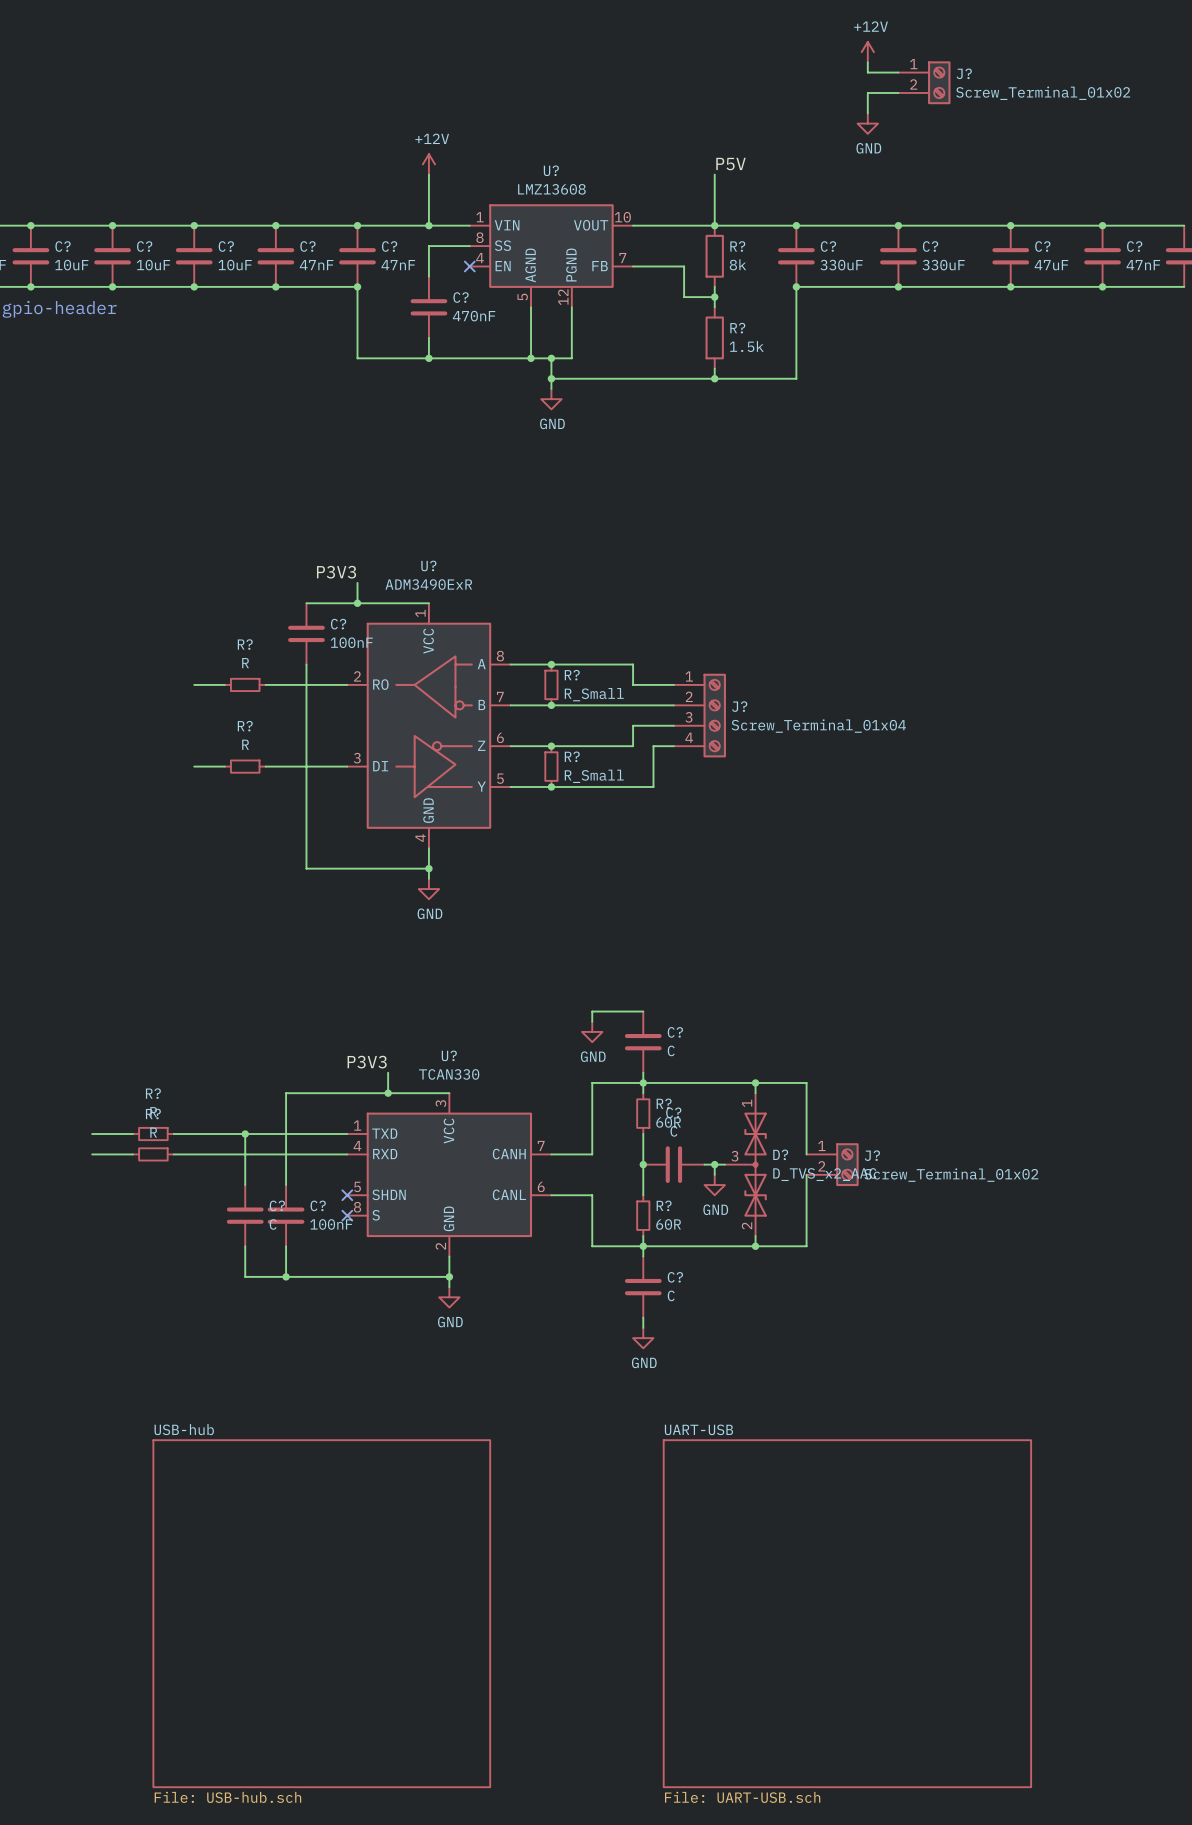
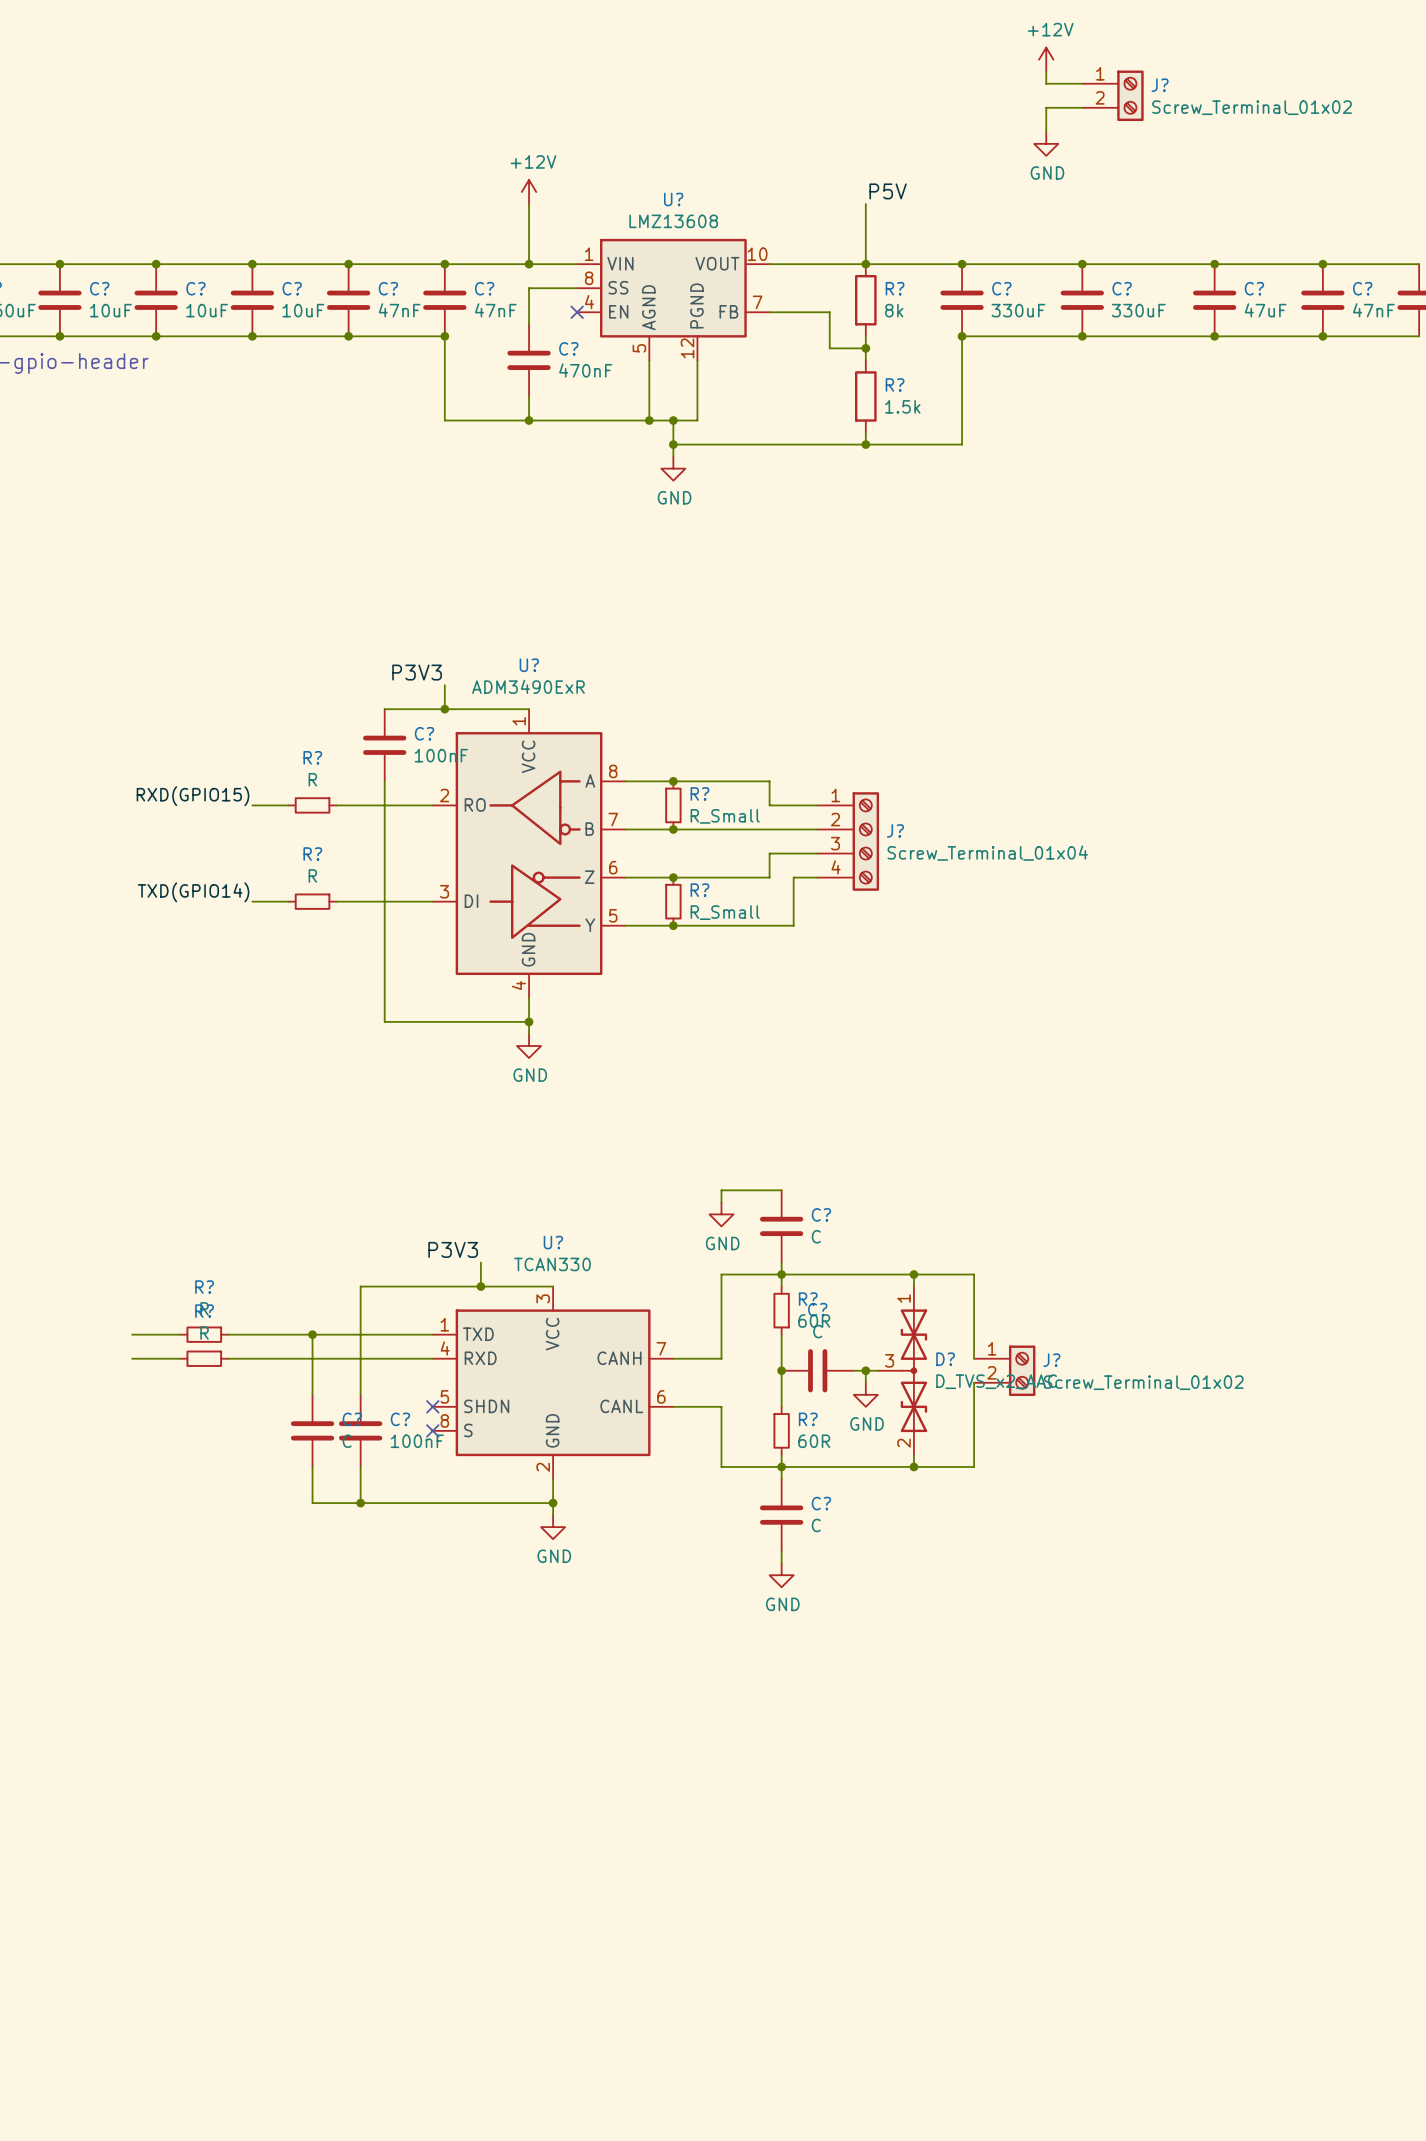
label: none -> RXD(GPIO15) (193, 796)
label: none -> TXD(GPIO14) (193, 892)
sheet USB-hub: File: USB-hub.sch (321, 1613) -> none
sheet UART-USB: File: UART-USB.sch (847, 1613) -> none

